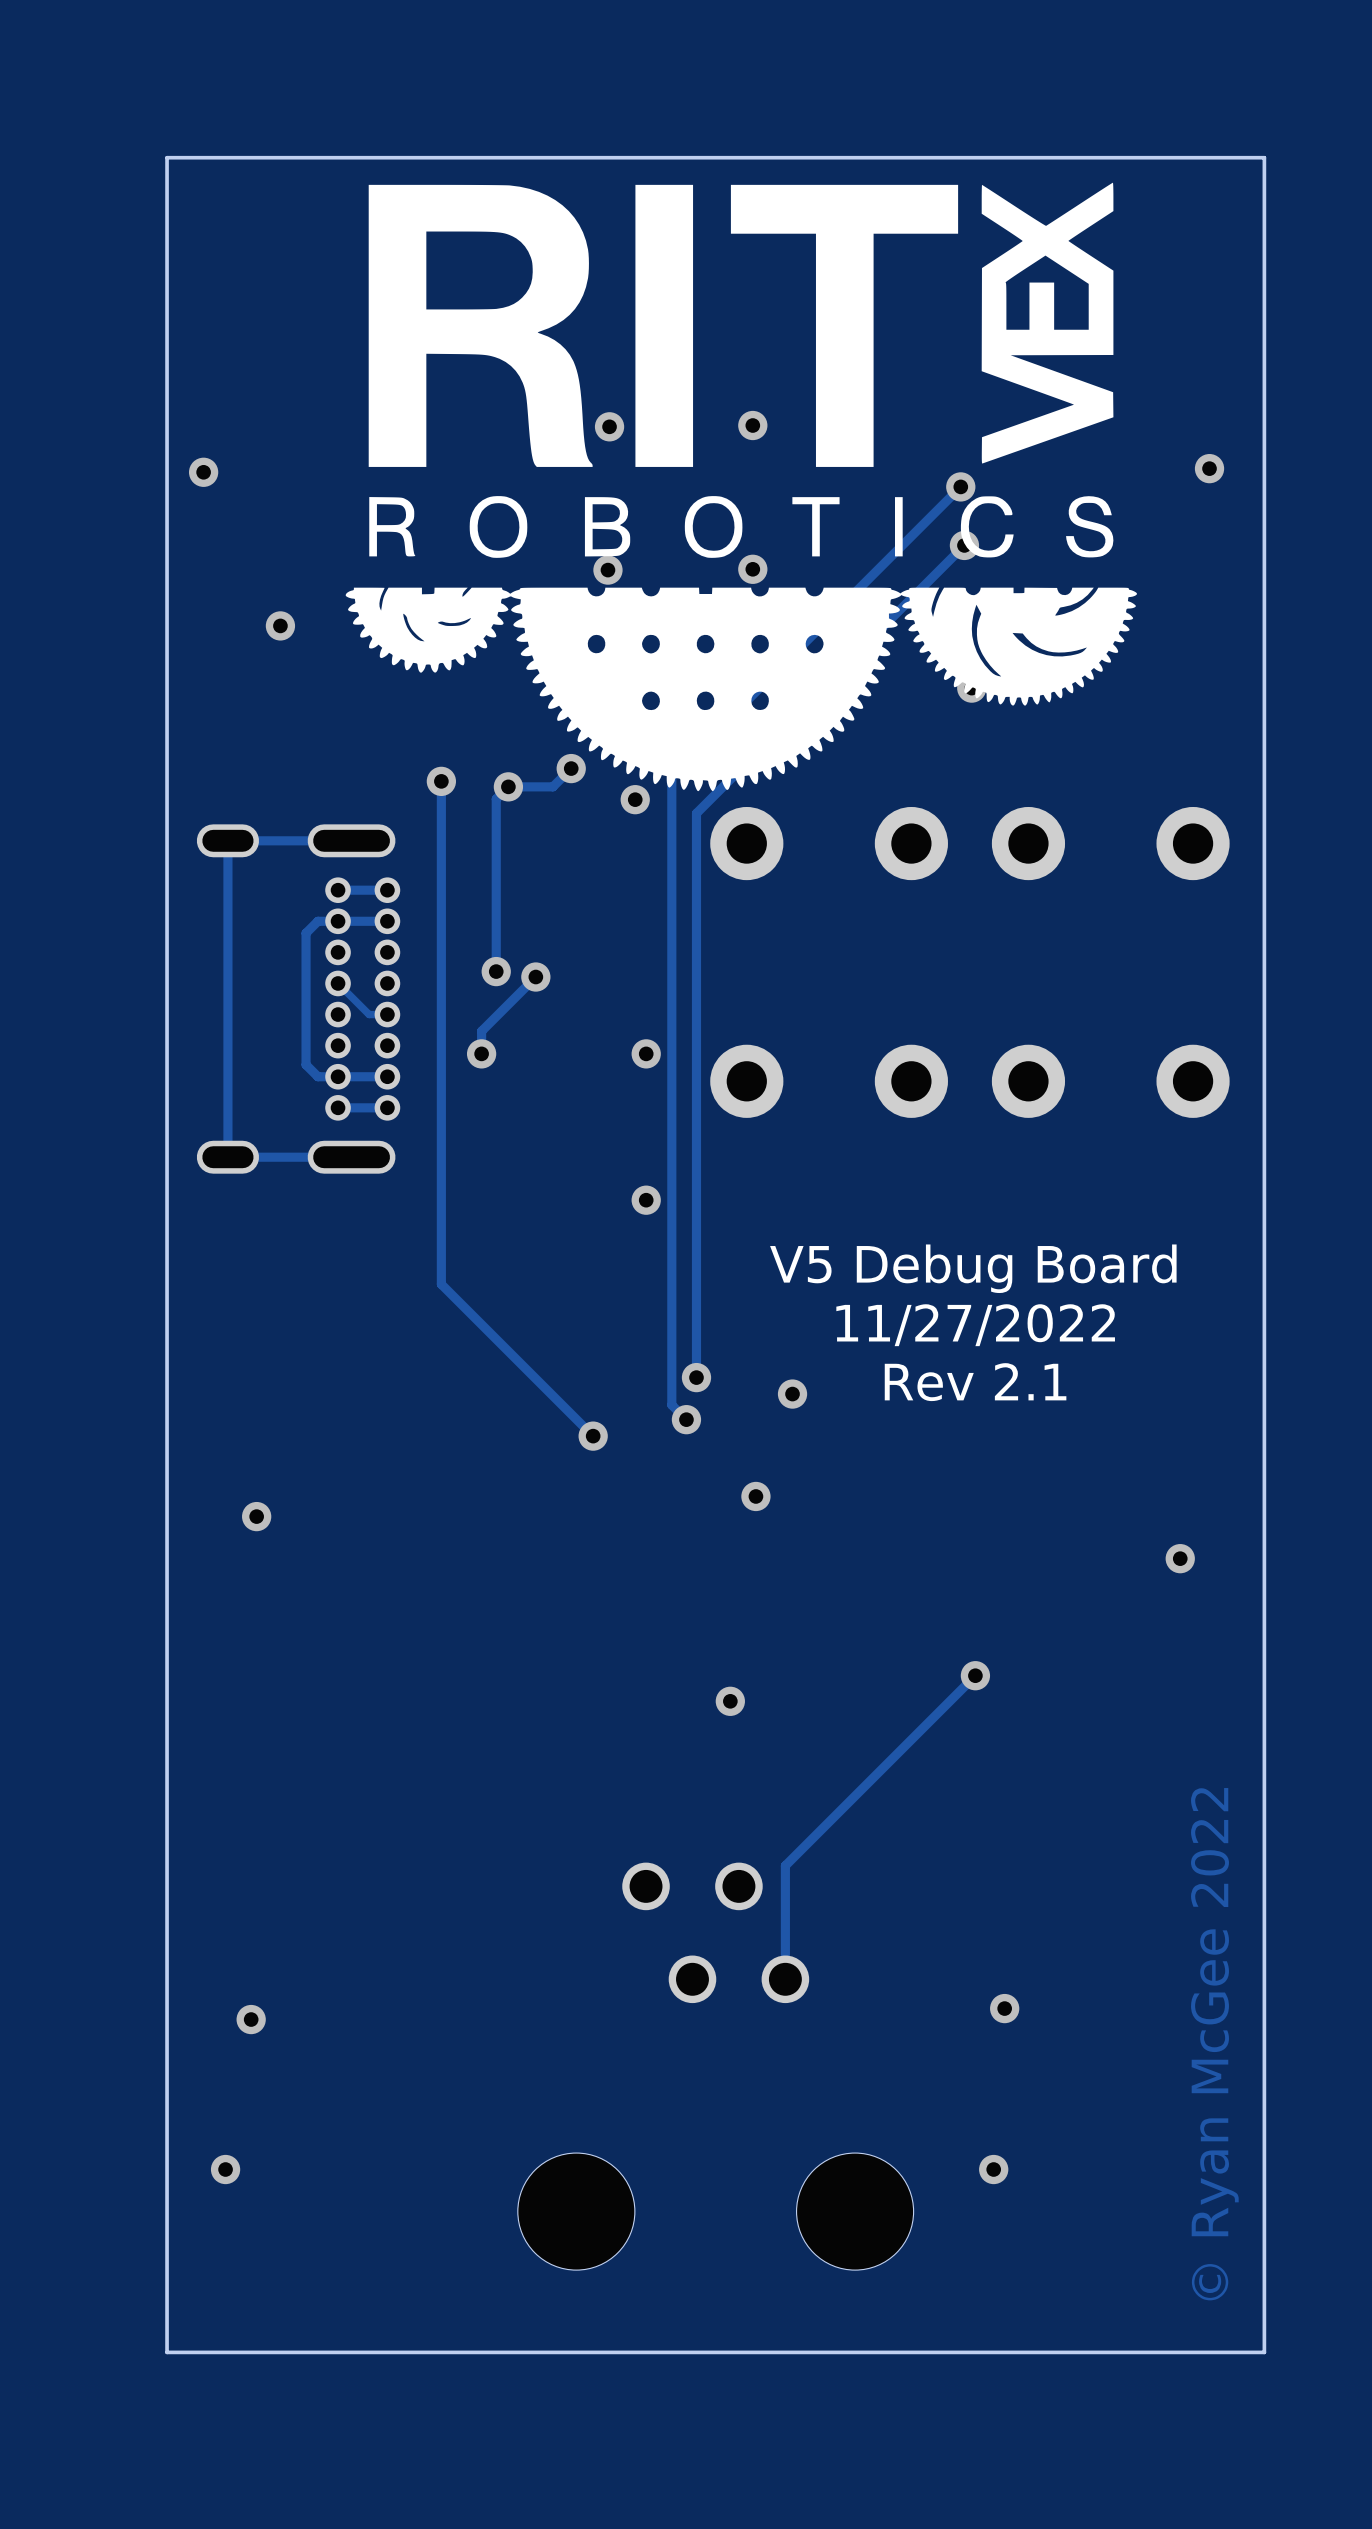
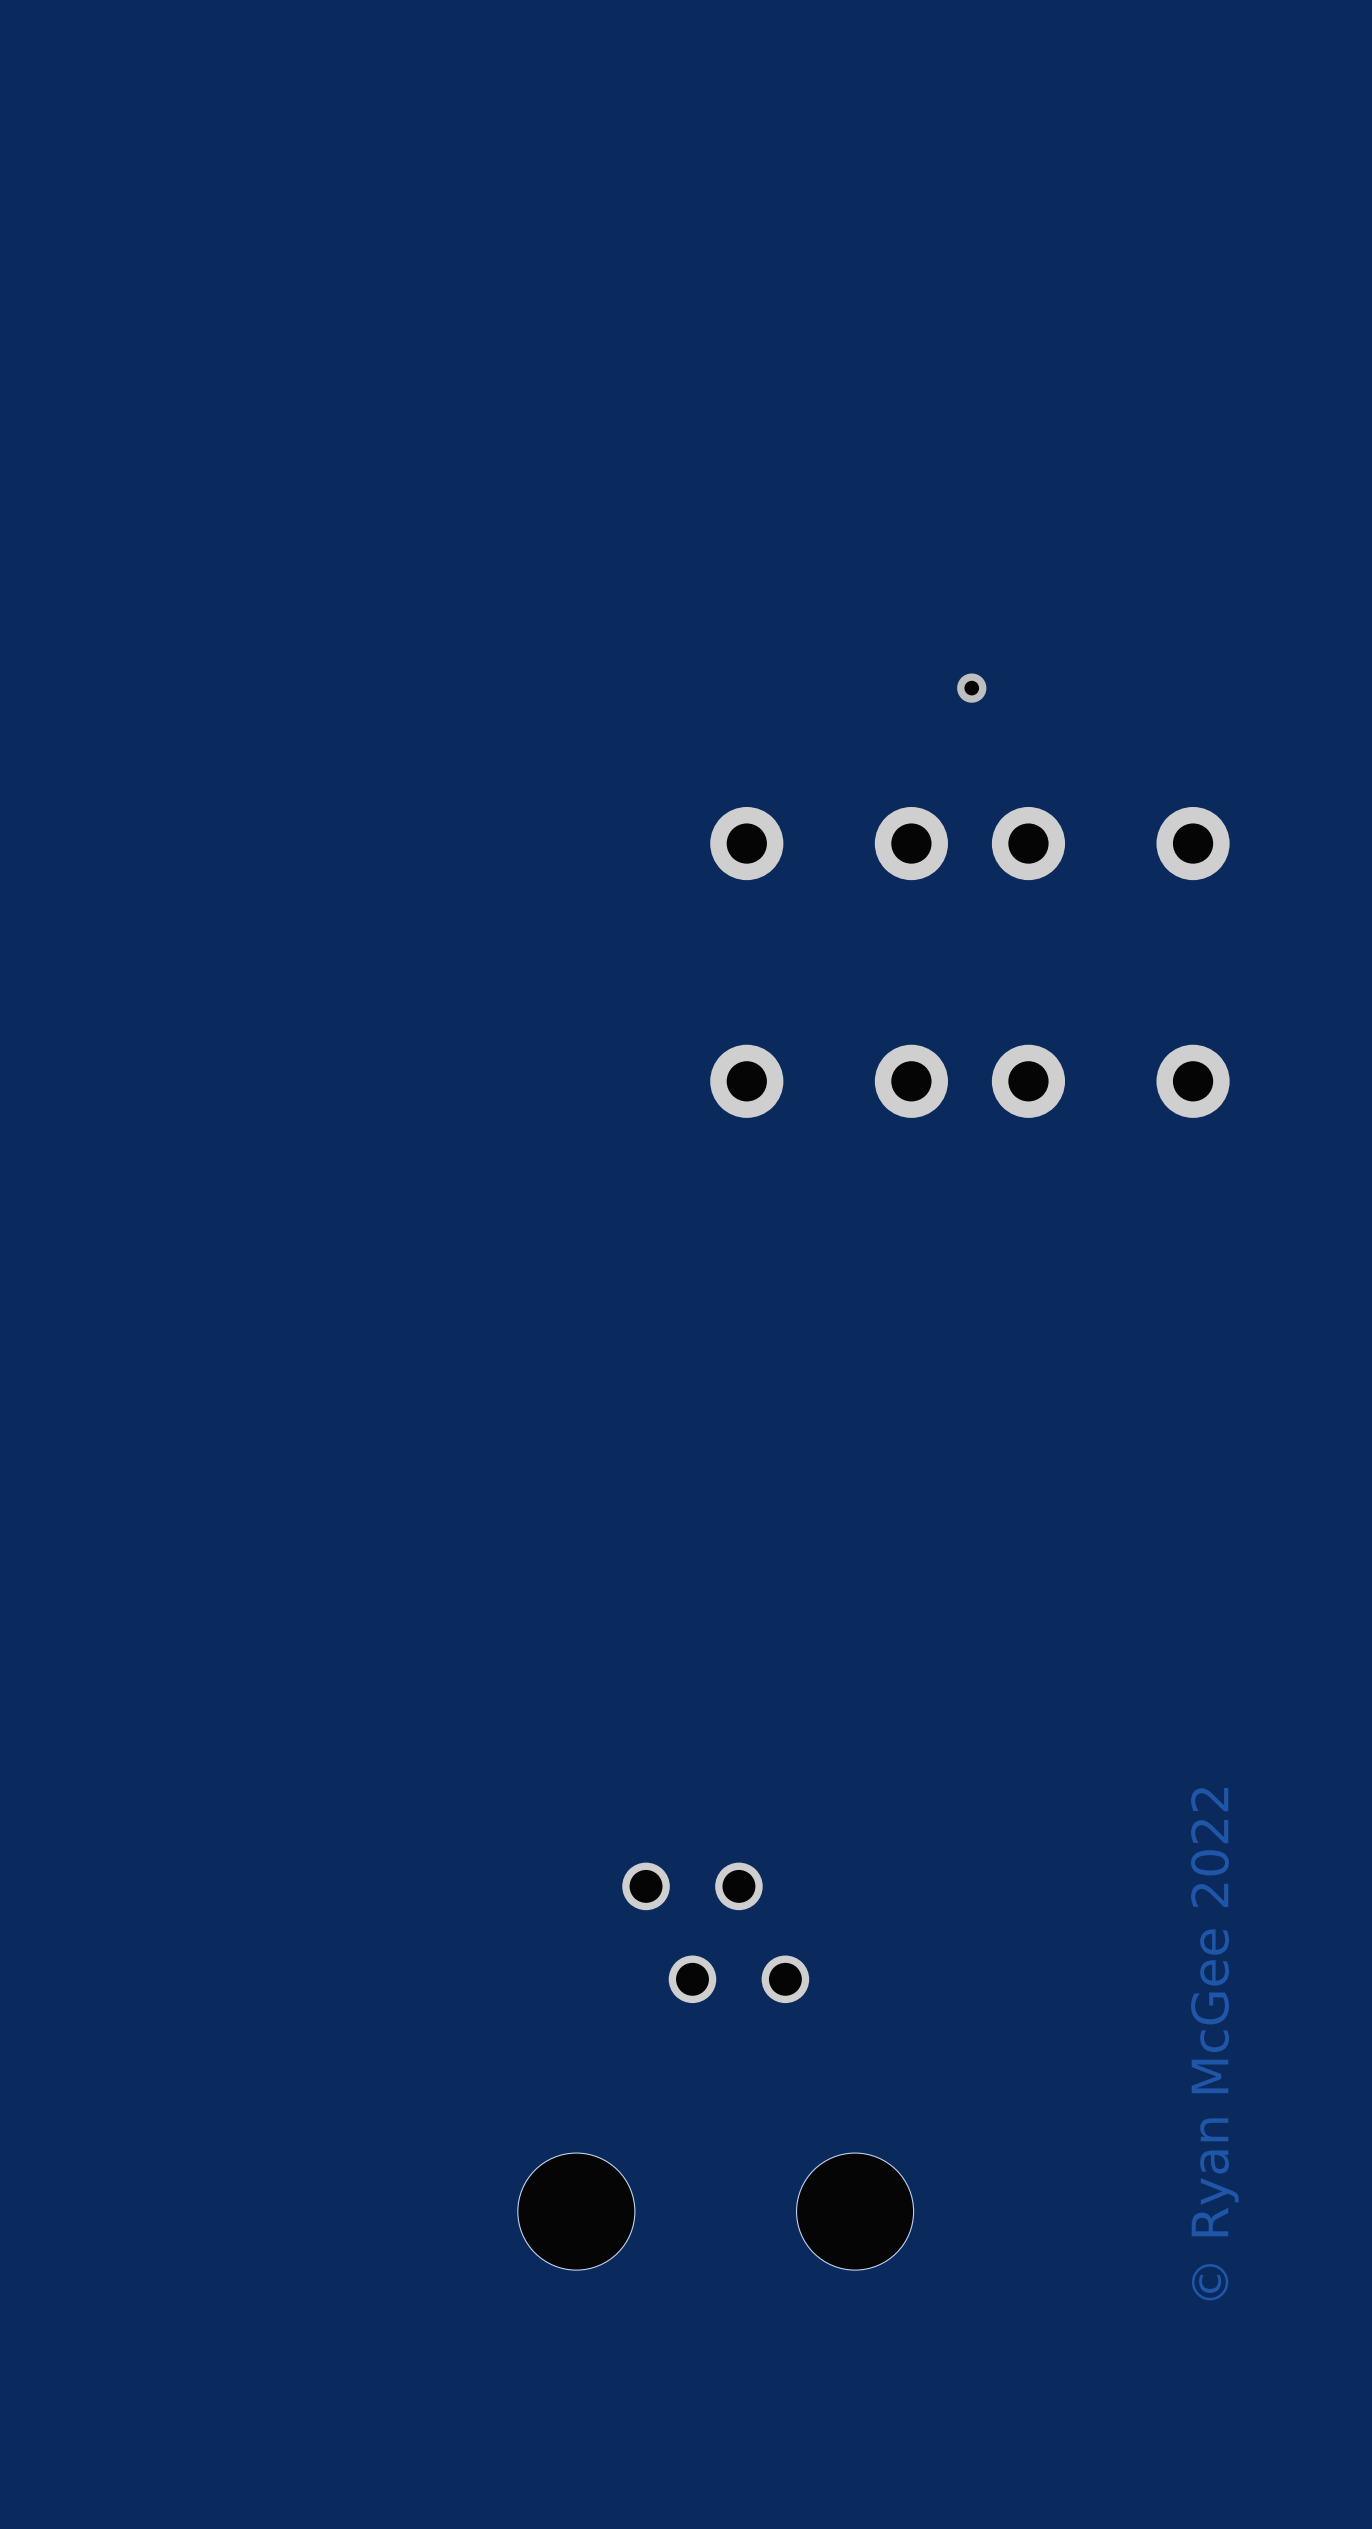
board edge: (1264, 157) (167, 157) (167, 2352) (1264, 2352) (1264, 157) -> none
drawing: [345, 182, 1137, 792] -> none
via: (752, 425) -> none
via: (609, 426) -> none
via: (1209, 468) -> none
via: (203, 472) -> none
track: (960, 486) (671, 775) (671, 1405) (686, 1419) -> none
via: (960, 486) -> none
track: (964, 545) (696, 813) (696, 1377) -> none
via: (964, 545) -> none
via: (752, 569) -> none
via: (607, 570) -> none
via: (280, 625) -> none
track: (571, 768) (552, 786) (508, 786) (496, 799) (496, 971) -> none
via: (571, 768) -> none
track: (441, 781) (441, 1284) (593, 1436) -> none
via: (441, 781) -> none
via: (508, 786) -> none
via: (635, 799) -> none
track: (351, 840) (227, 840) (227, 1157) (351, 1157) -> none
track: (387, 890) (338, 890) -> none
track: (387, 921) (317, 921) (306, 933) (306, 1064) (317, 1076) (387, 1076) -> none
via: (496, 971) -> none
track: (535, 977) (481, 1031) (481, 1053) -> none
via: (535, 977) -> none
track: (338, 983) (369, 1014) (387, 1014) -> none
part: (298, 999) -> none
via: (481, 1053) -> none
via: (646, 1053) -> none
track: (387, 1107) (338, 1107) -> none
via: (646, 1200) -> none
text: V5 Debug Board (973, 1268) -> none
text: 11/27/2022 (975, 1325) -> none
via: (696, 1377) -> none
text: Rev 2.1 (975, 1382) -> none
via: (792, 1394) -> none
via: (686, 1419) -> none
via: (593, 1436) -> none
via: (755, 1496) -> none
via: (256, 1516) -> none
via: (1180, 1558) -> none
track: (975, 1675) (785, 1865) (785, 1979) -> none
via: (975, 1675) -> none
via: (730, 1701) -> none
via: (1004, 2008) -> none
via: (251, 2019) -> none
via: (225, 2169) -> none
via: (993, 2169) -> none

